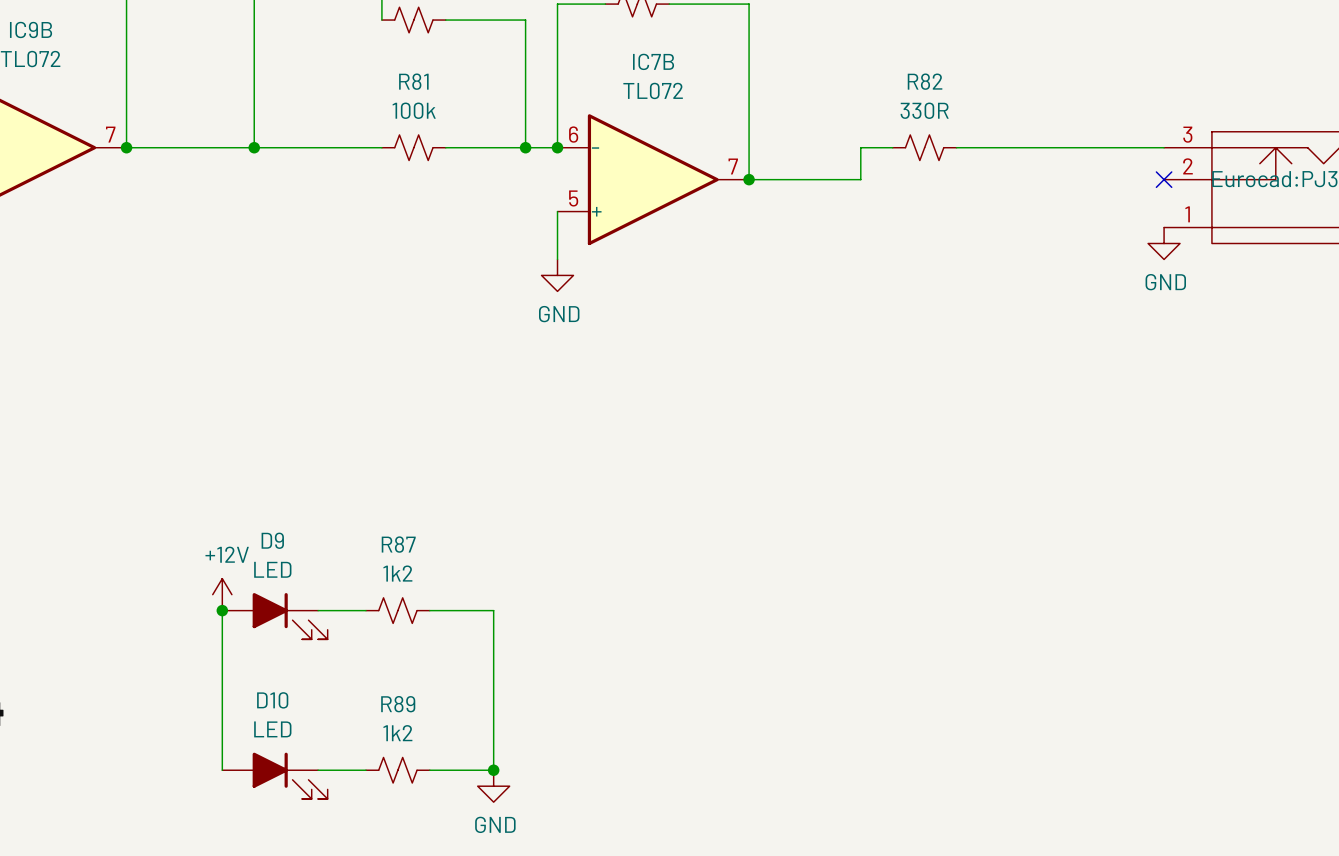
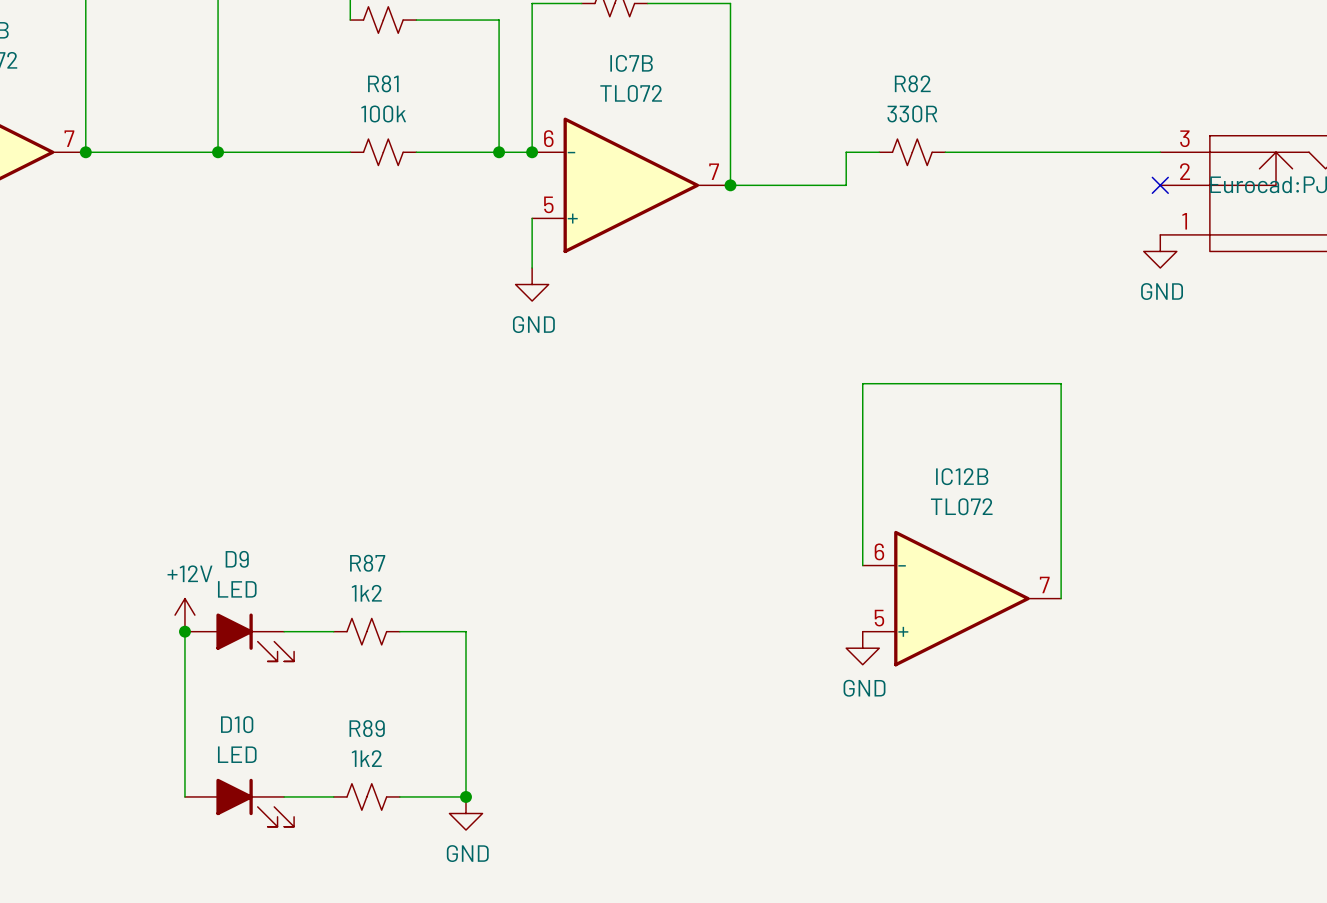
wire: none -> (862, 565) (862, 383) (1061, 383) (1061, 598)
IC12B: none -> TL072 (961, 598)
power symbol: none -> GND (862, 648)

